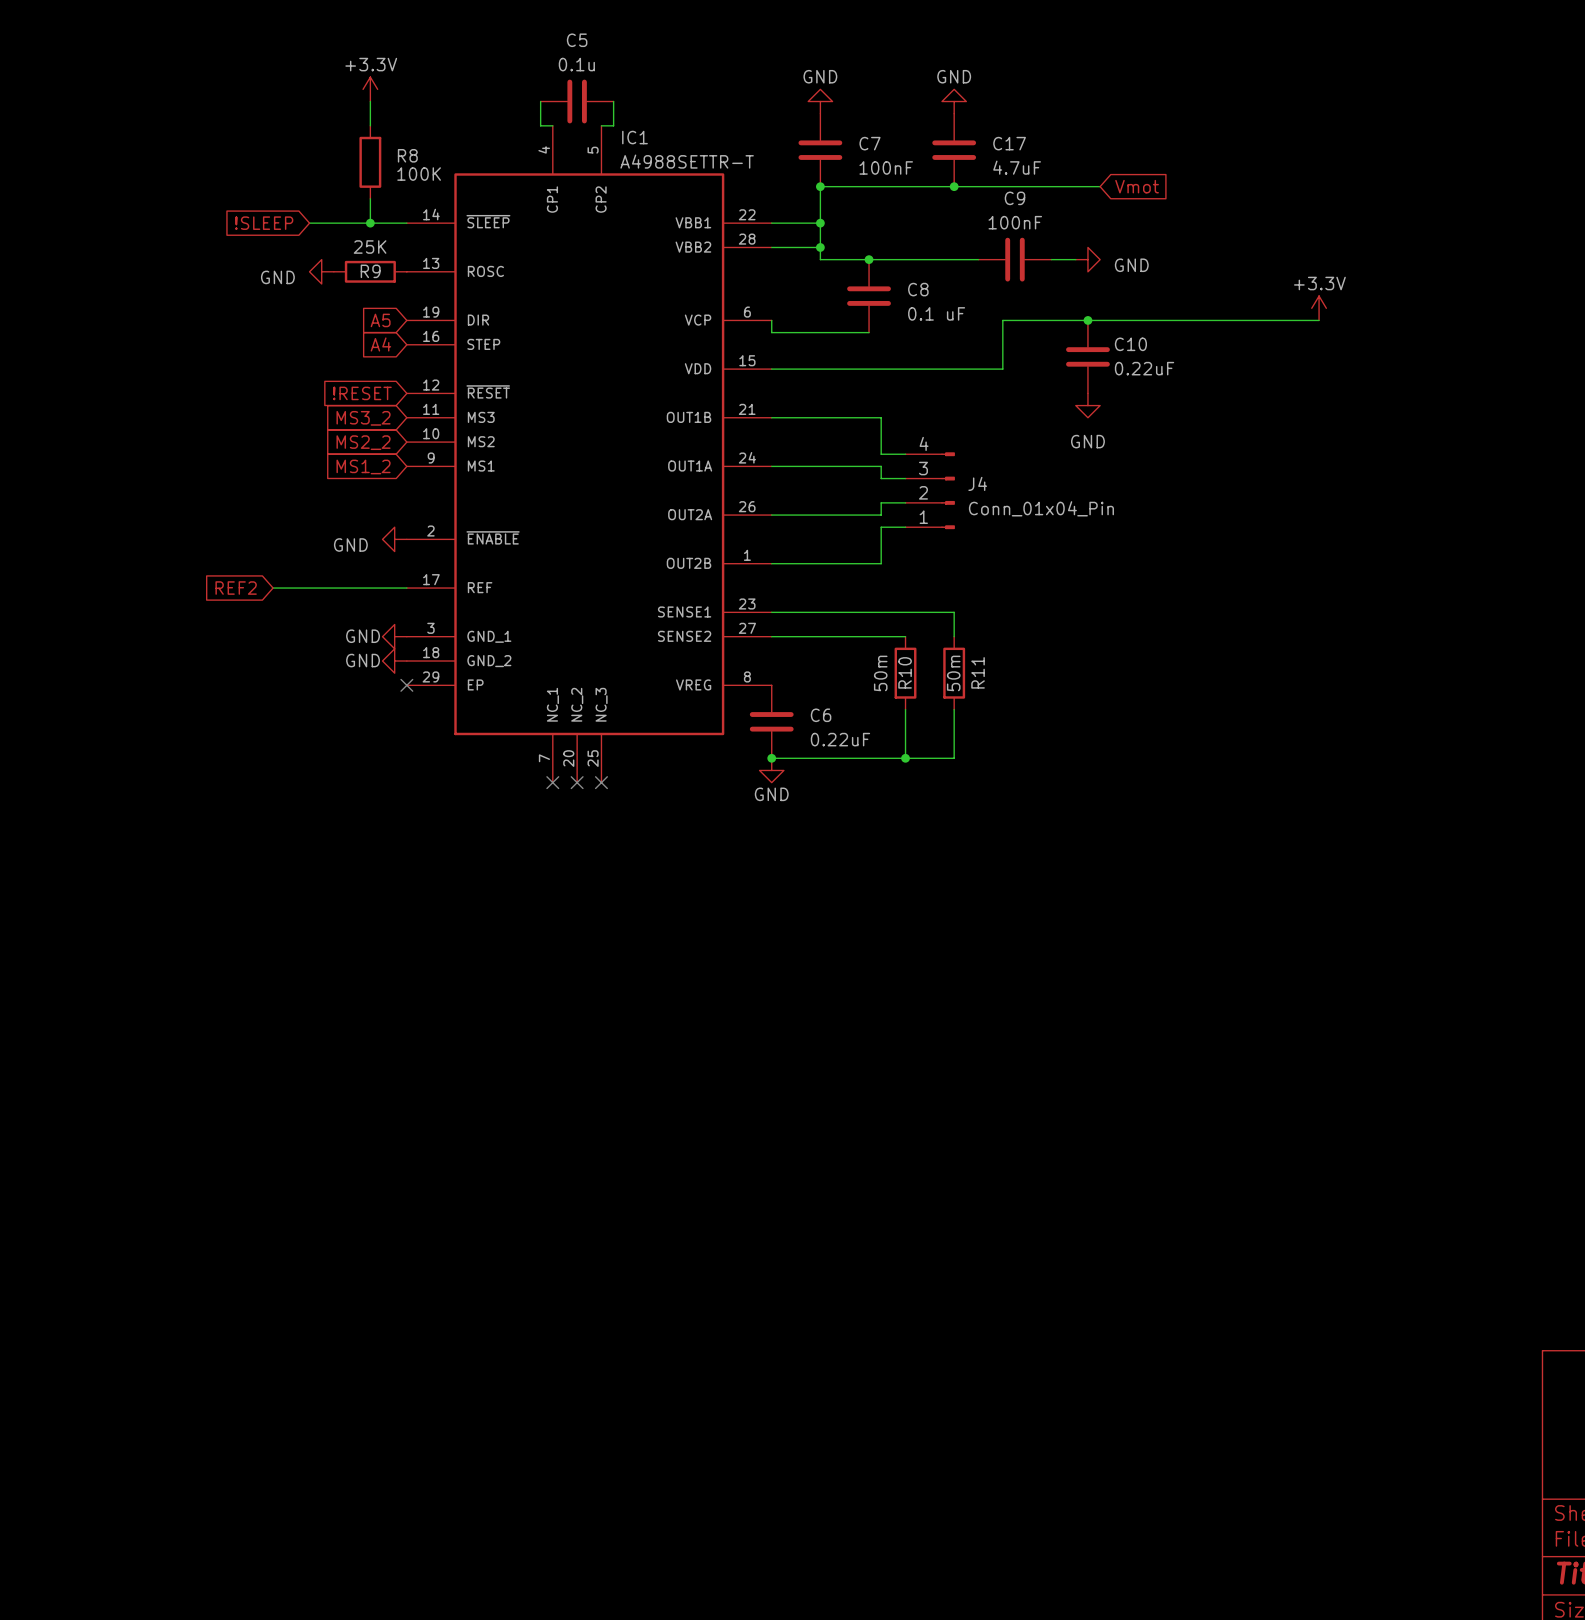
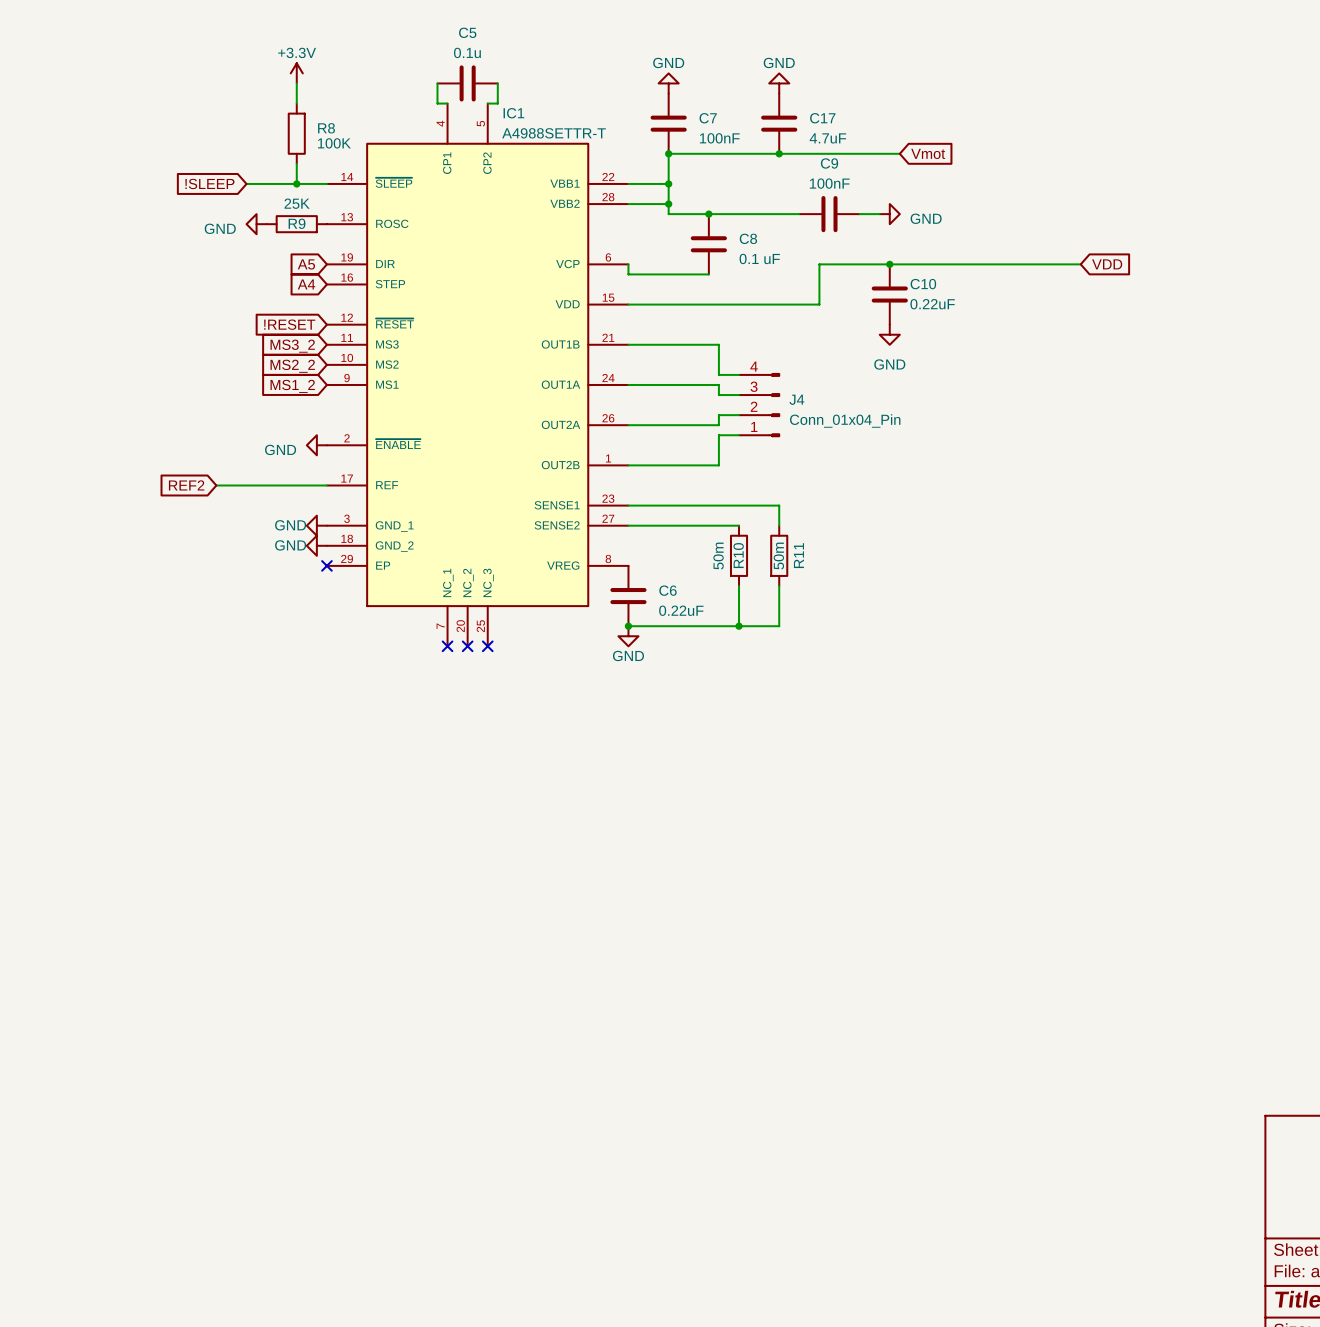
power symbol: +3.3V (1319, 308) -> none
global label: none -> VDD (1107, 264)

